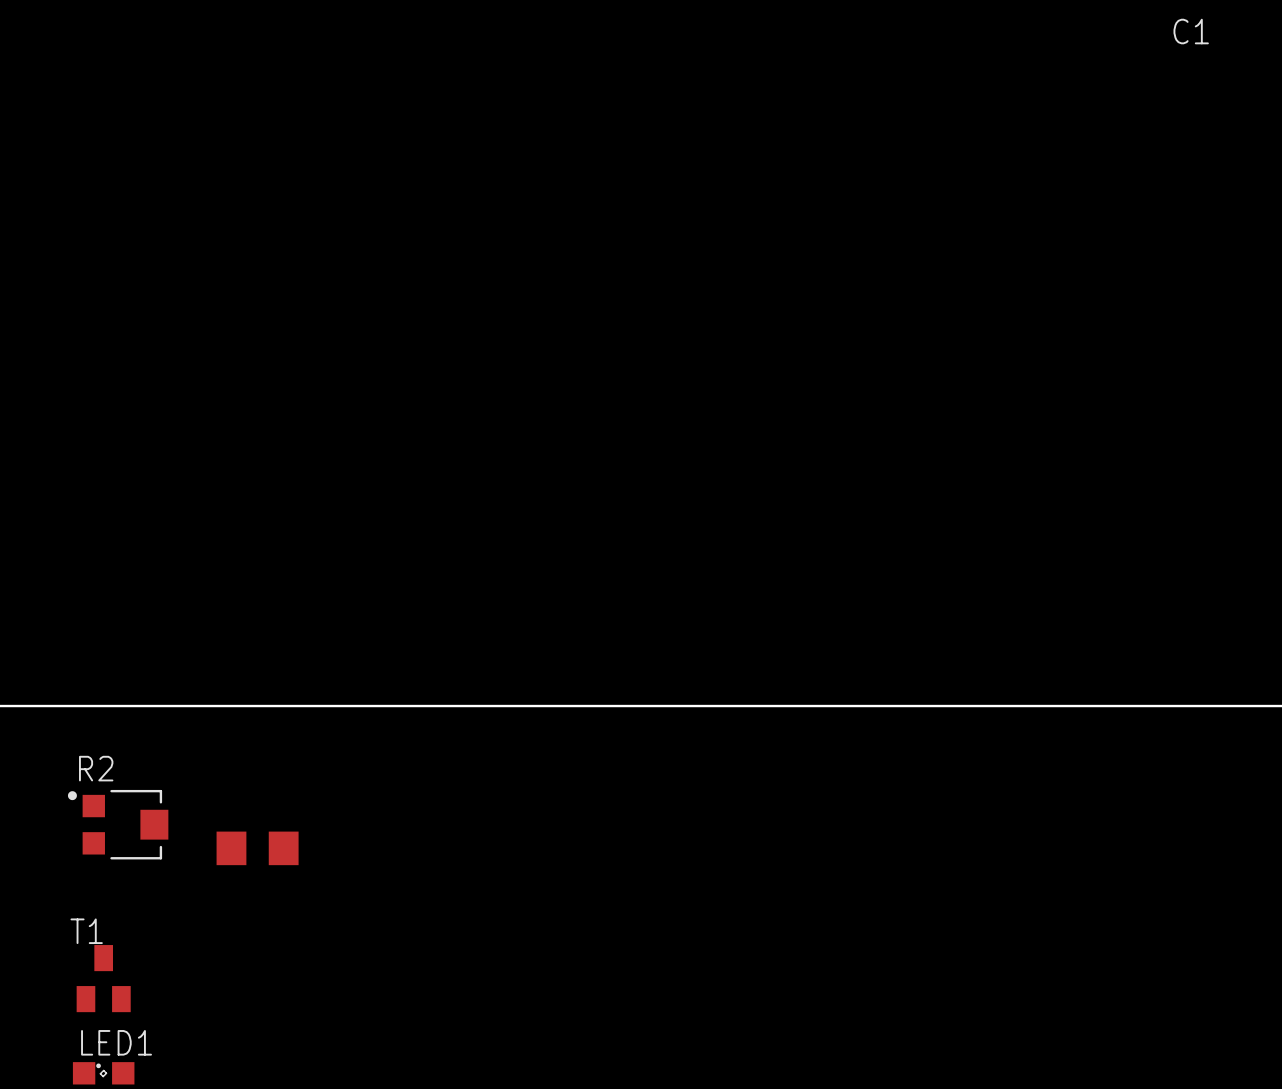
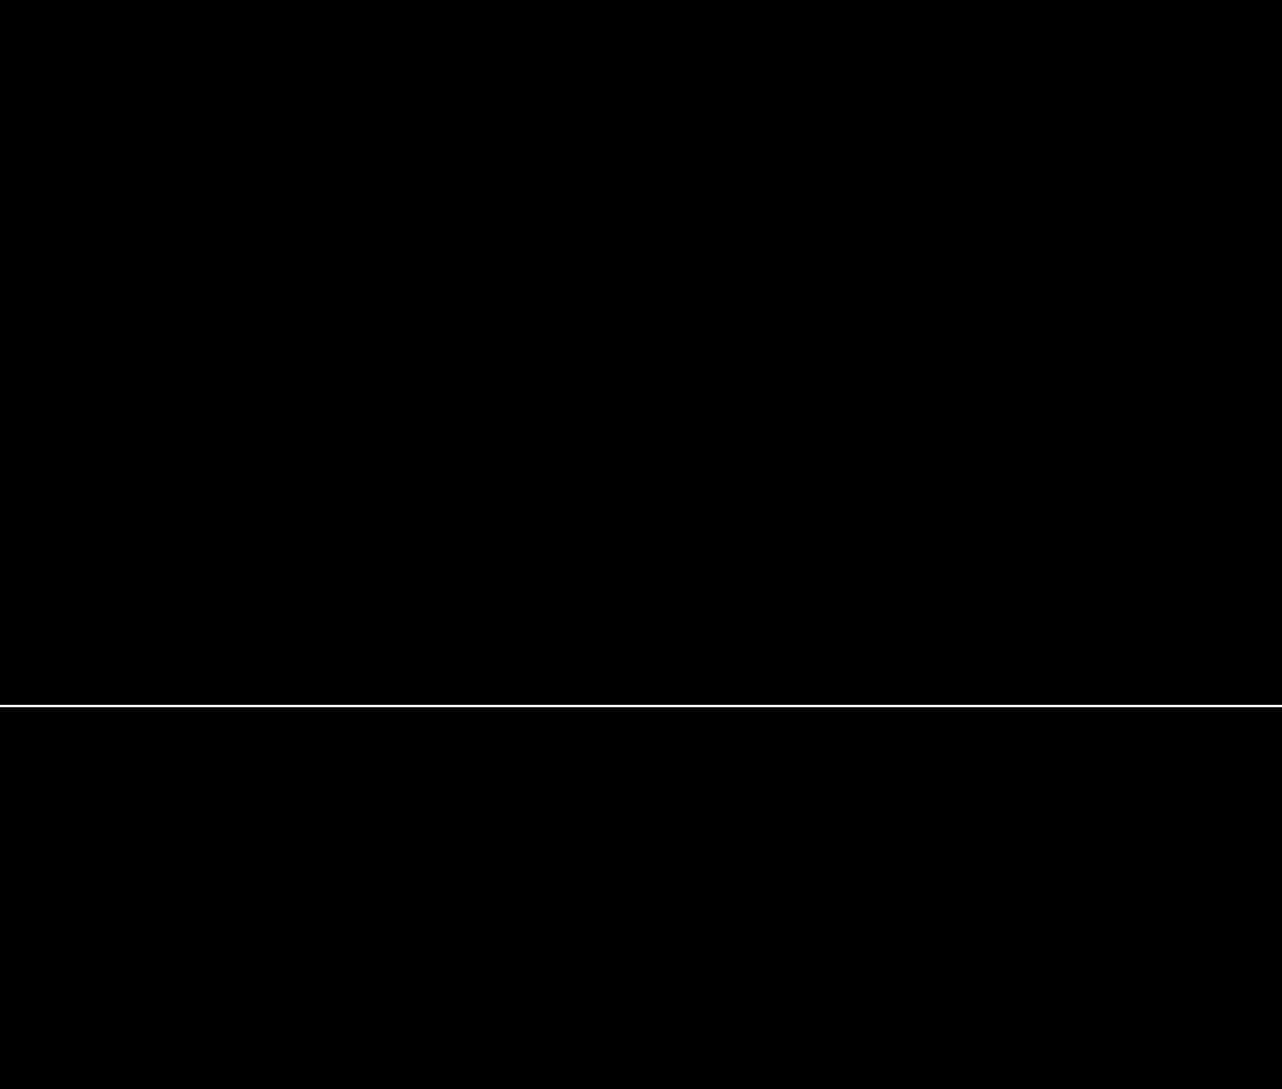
R2: (118, 824) -> none
C1: (257, 848) -> none
T1: (103, 978) -> none
LED1: (103, 1073) -> none

